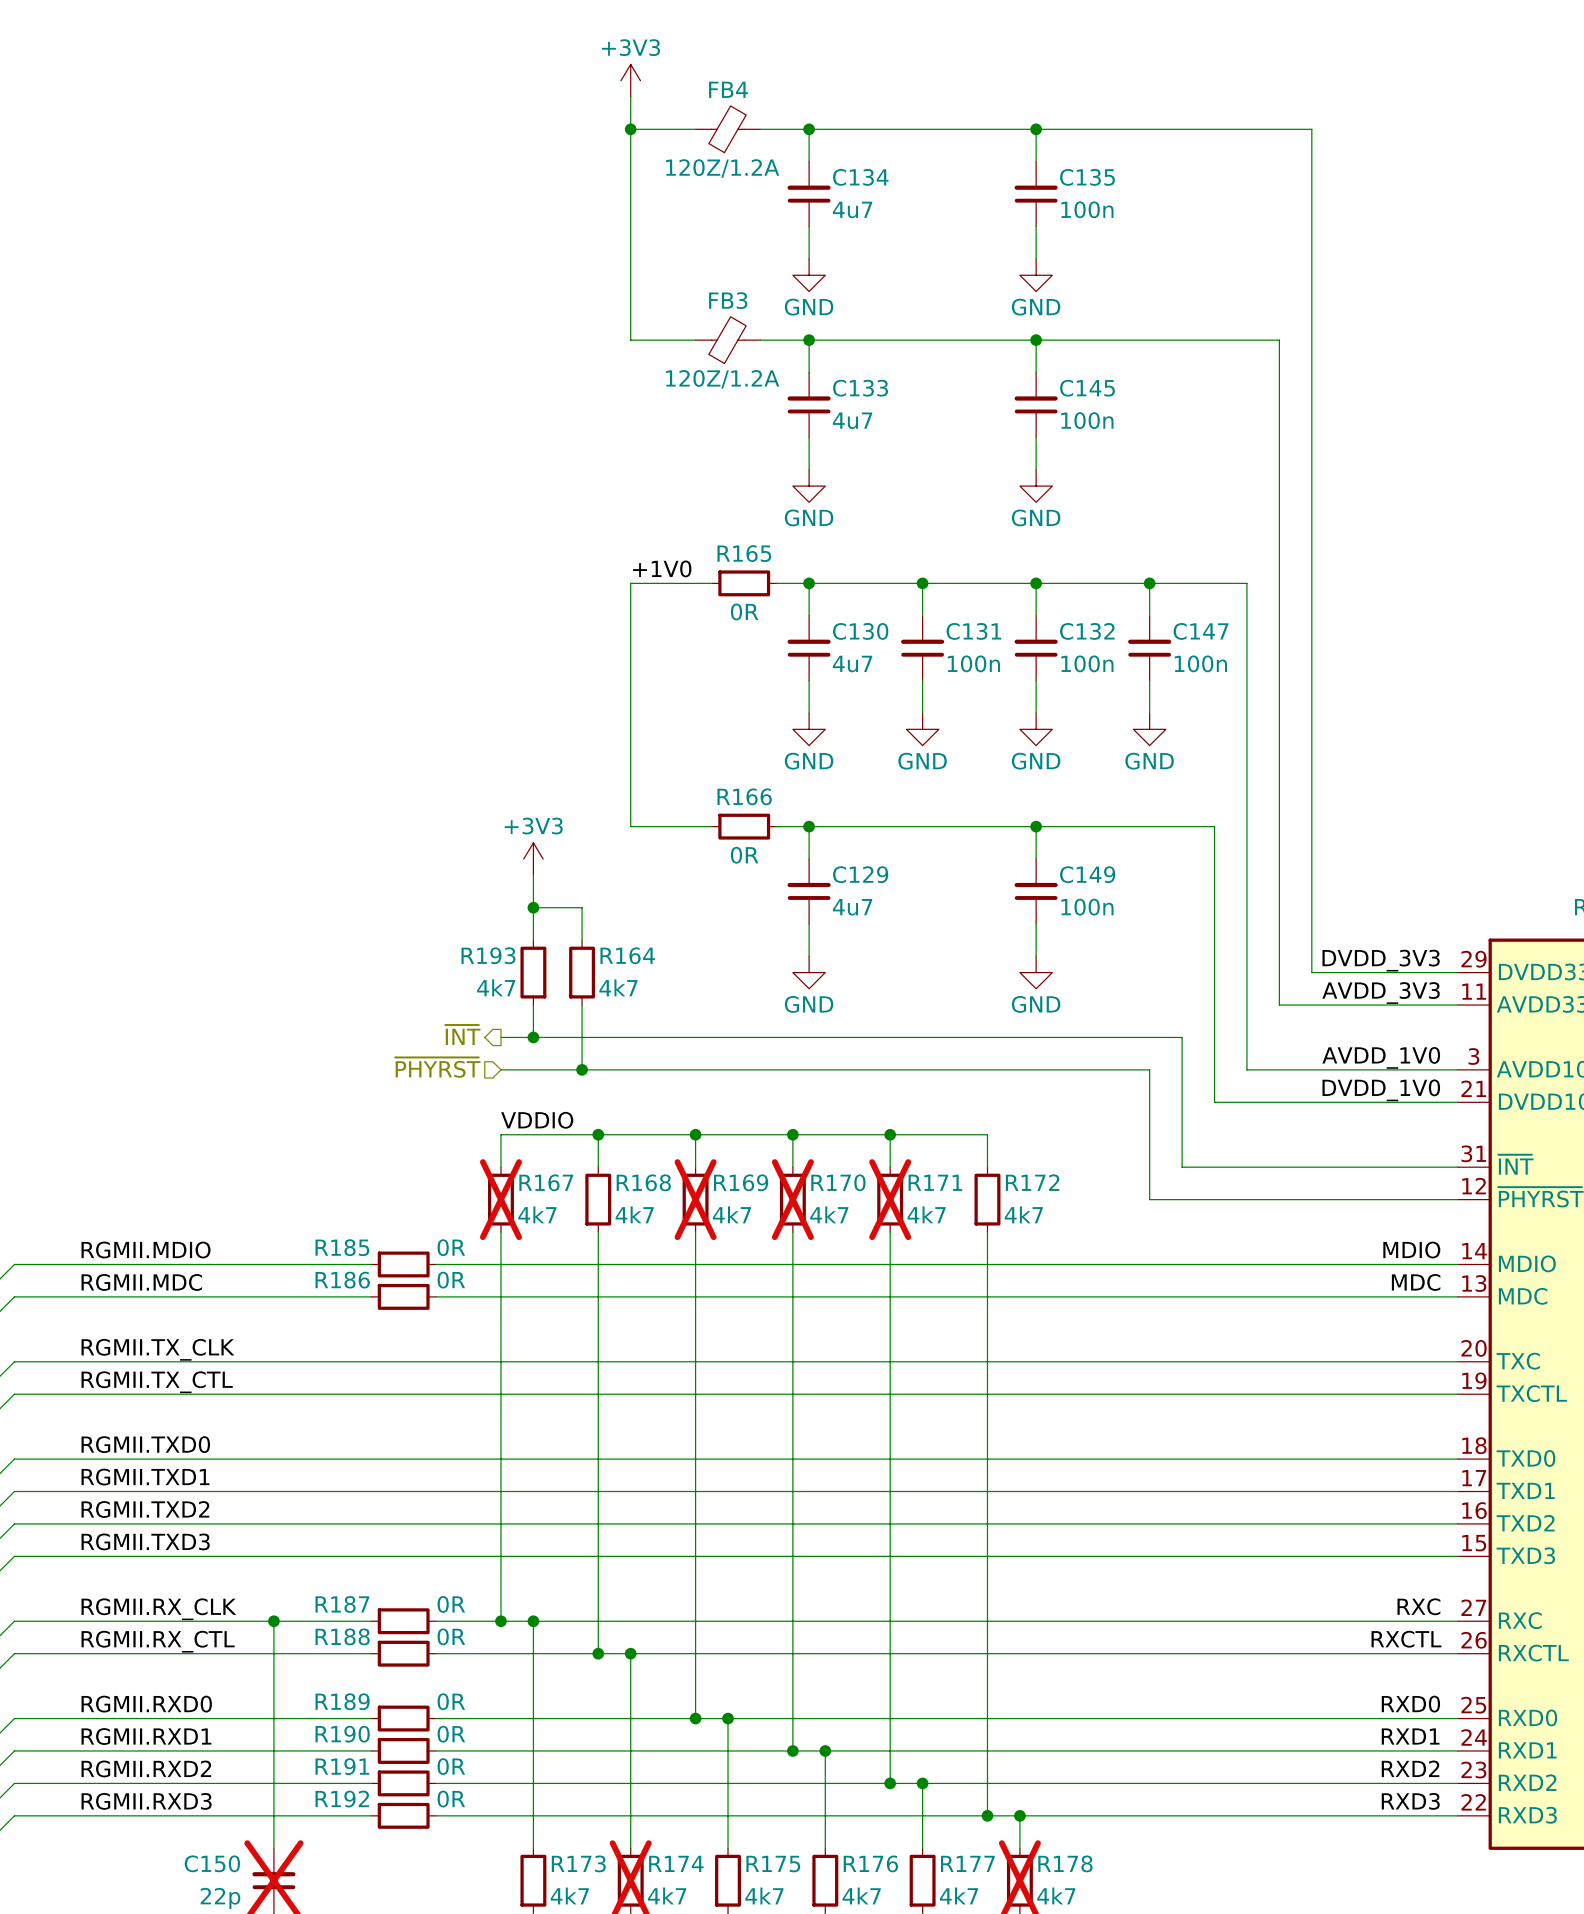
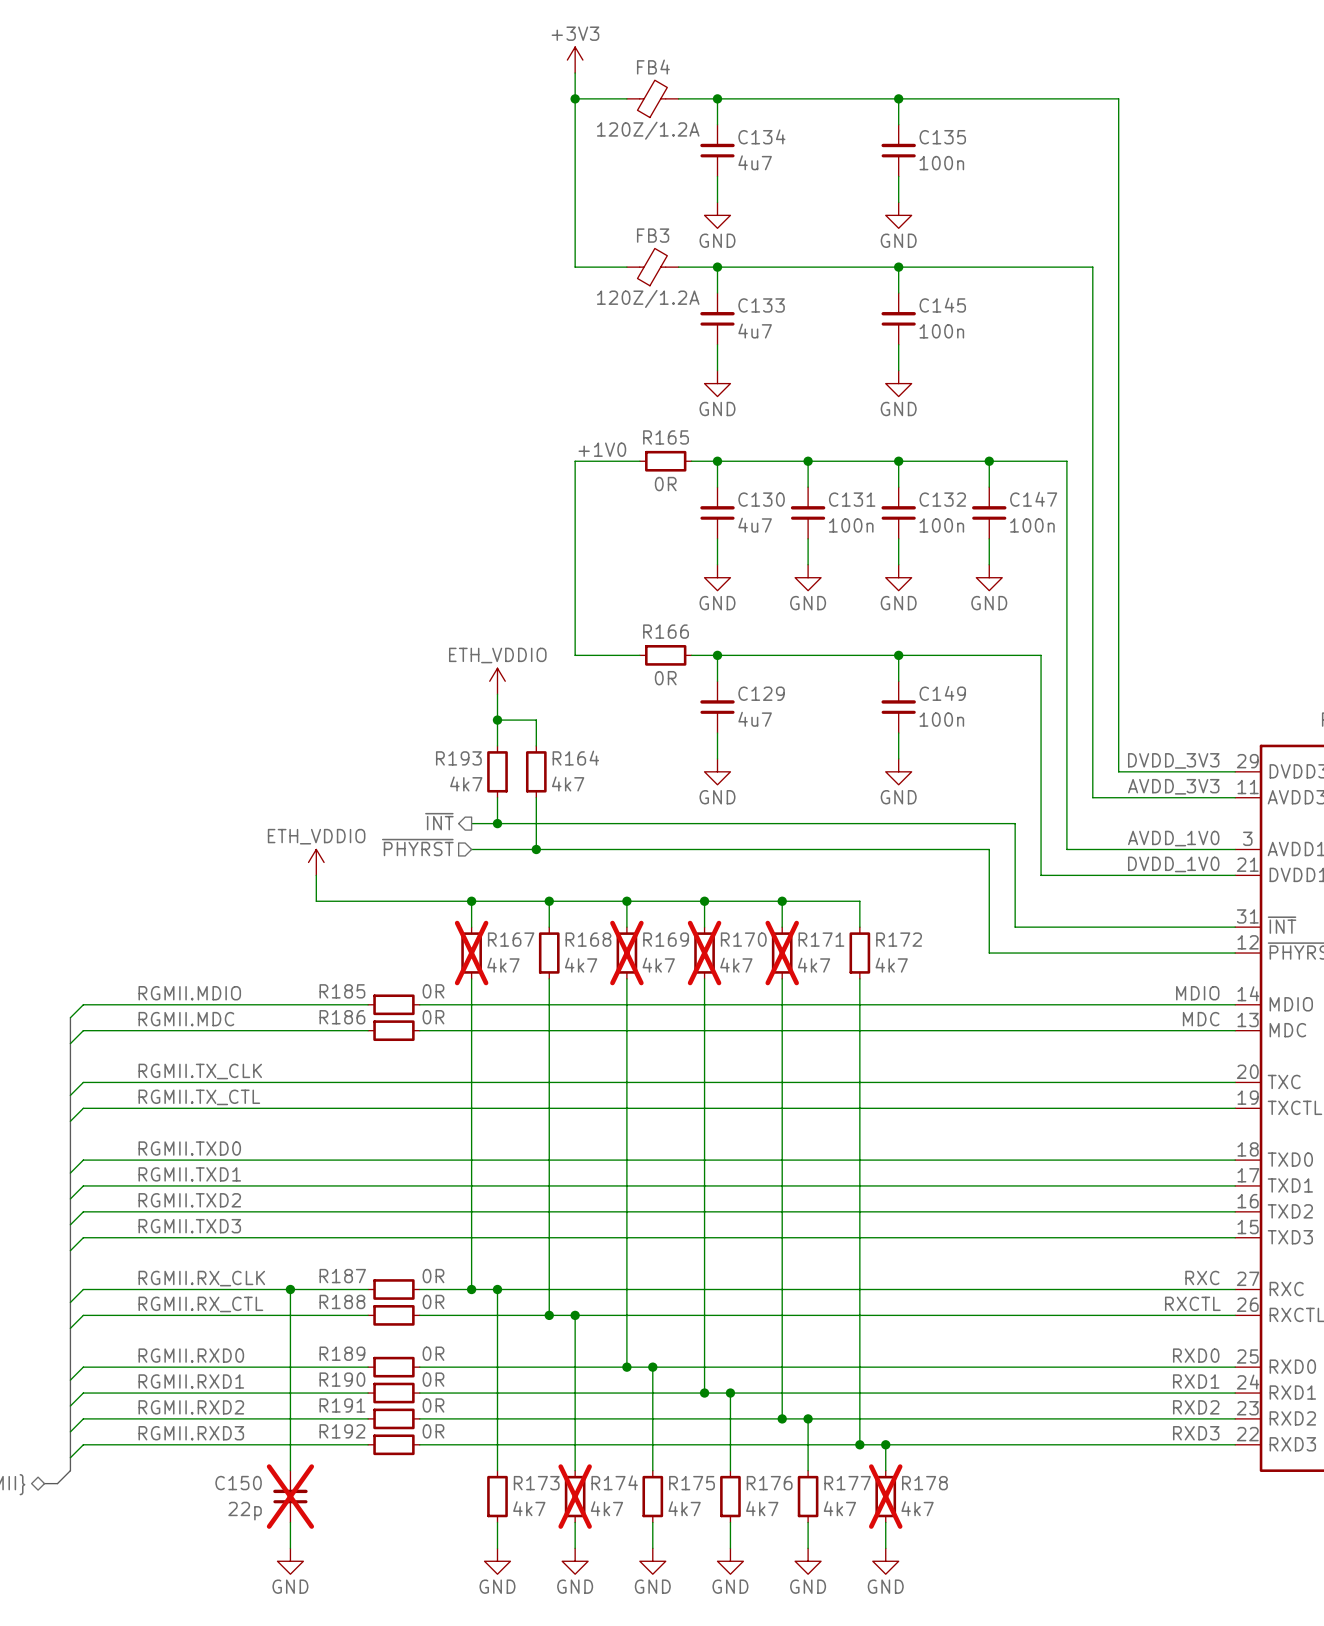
power symbol: +3V3 (533, 859) -> ETH_VDDIO (497, 681)
power symbol: none -> ETH_VDDIO (316, 862)
wire: none -> (316, 875) (316, 901) (471, 901)
label: VDDIO (537, 1120) -> none
junction: none -> (471, 901)

